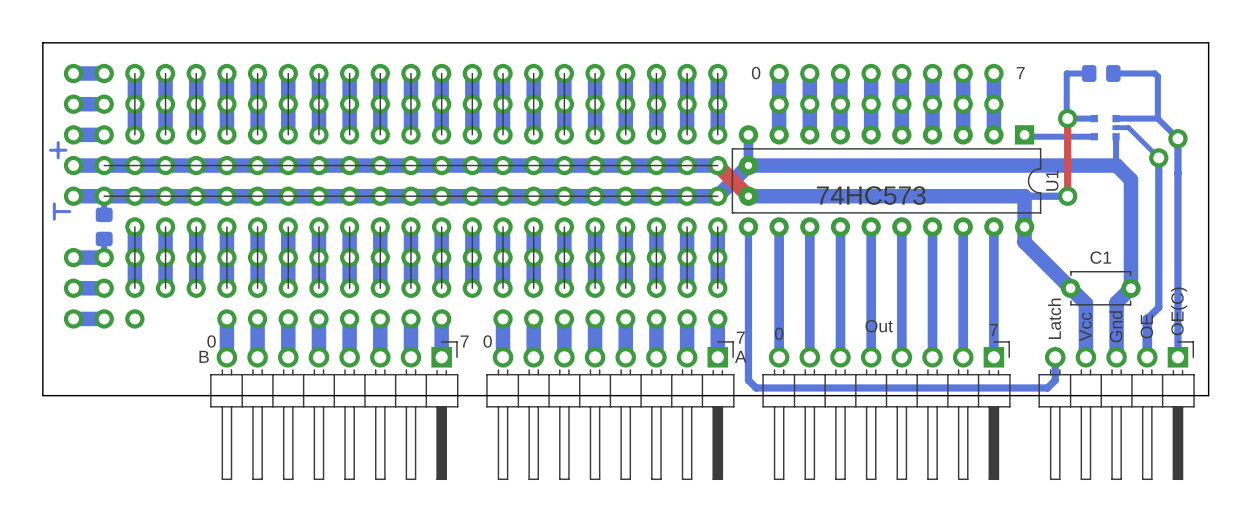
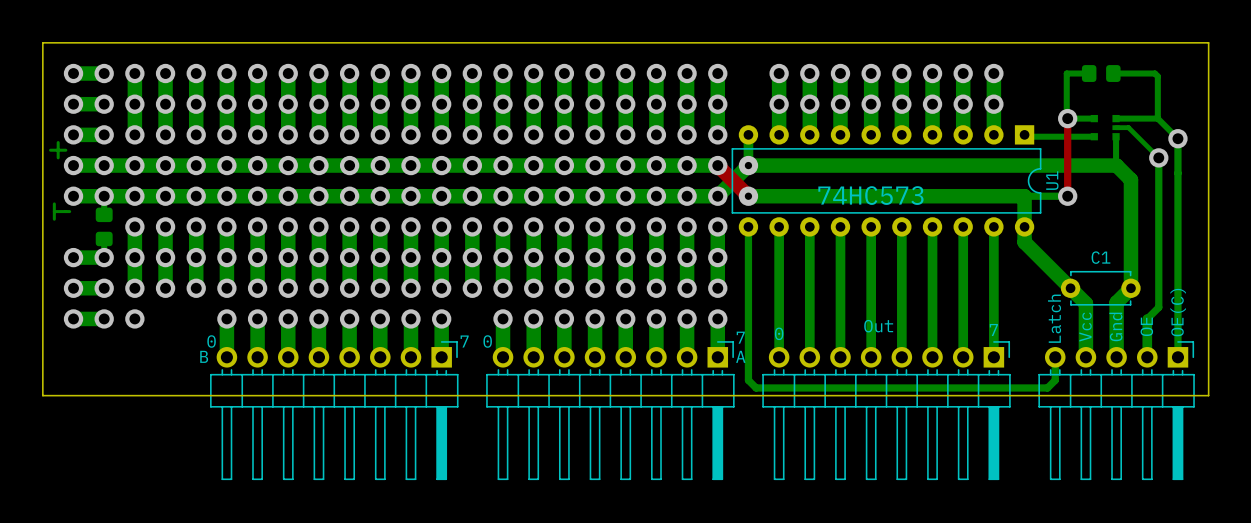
line: (134, 73) (134, 134) -> none
line: (165, 73) (165, 134) -> none
line: (196, 73) (196, 134) -> none
line: (226, 73) (226, 134) -> none
line: (257, 73) (257, 134) -> none
line: (288, 73) (288, 134) -> none
line: (318, 73) (318, 134) -> none
line: (349, 73) (349, 134) -> none
line: (380, 73) (380, 134) -> none
line: (410, 73) (410, 134) -> none
line: (441, 73) (441, 134) -> none
line: (472, 73) (472, 134) -> none
line: (503, 73) (503, 134) -> none
line: (533, 73) (533, 134) -> none
line: (564, 73) (564, 134) -> none
line: (595, 73) (595, 134) -> none
line: (625, 73) (625, 134) -> none
line: (656, 73) (656, 134) -> none
line: (687, 73) (687, 134) -> none
line: (717, 73) (717, 134) -> none
text: 0 (756, 73) -> none
text: 7 (1020, 73) -> none
line: (104, 165) (717, 165) -> none
line: (104, 196) (717, 196) -> none
line: (134, 226) (134, 288) -> none
line: (165, 226) (165, 288) -> none
line: (196, 226) (196, 288) -> none
line: (226, 226) (226, 288) -> none
line: (257, 226) (257, 288) -> none
line: (288, 226) (288, 288) -> none
line: (318, 226) (318, 288) -> none
line: (349, 226) (349, 288) -> none
line: (380, 226) (380, 288) -> none
line: (410, 226) (410, 288) -> none
line: (441, 226) (441, 288) -> none
line: (472, 226) (472, 288) -> none
line: (503, 226) (503, 288) -> none
line: (533, 226) (533, 288) -> none
line: (564, 226) (564, 288) -> none
line: (595, 226) (595, 288) -> none
line: (625, 226) (625, 288) -> none
line: (656, 226) (656, 288) -> none
line: (687, 226) (687, 288) -> none
line: (717, 226) (717, 288) -> none

